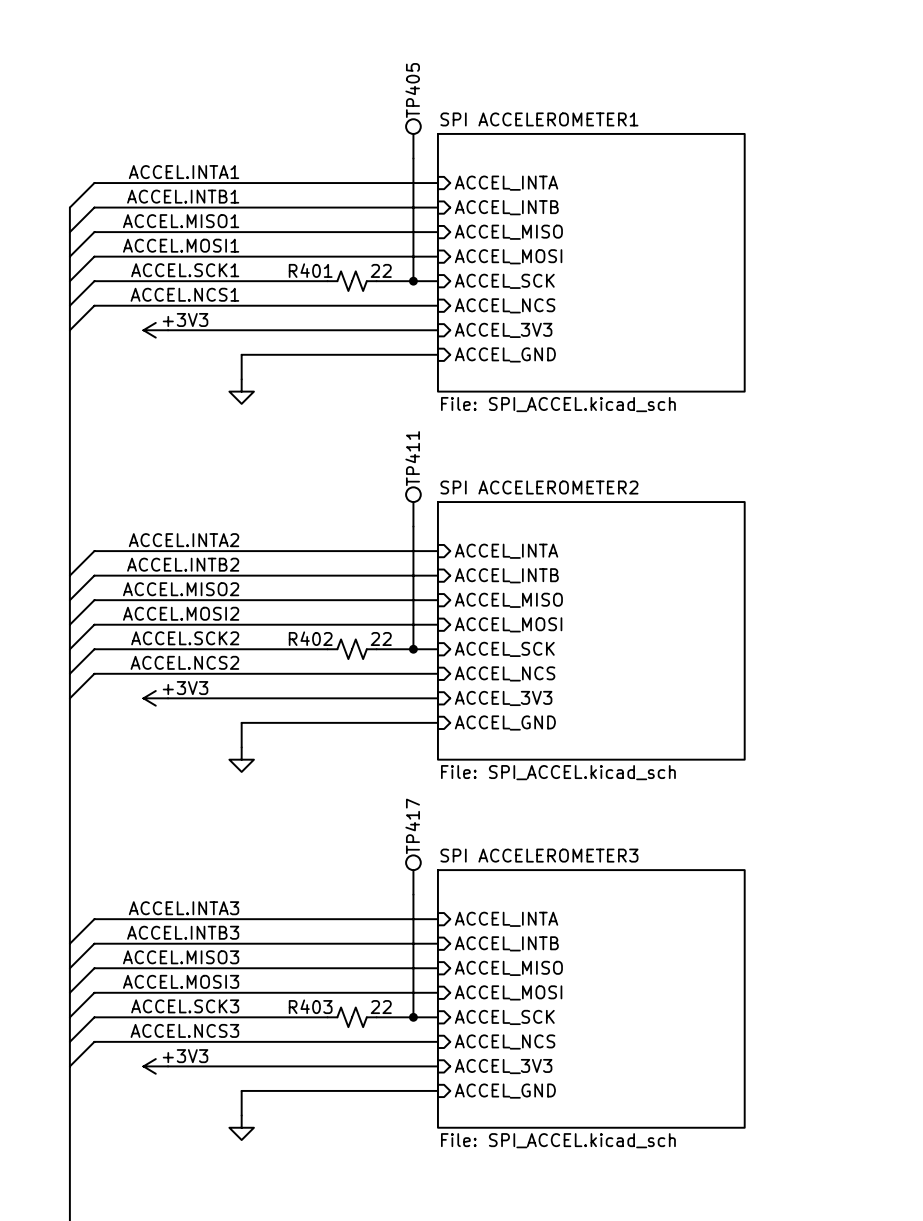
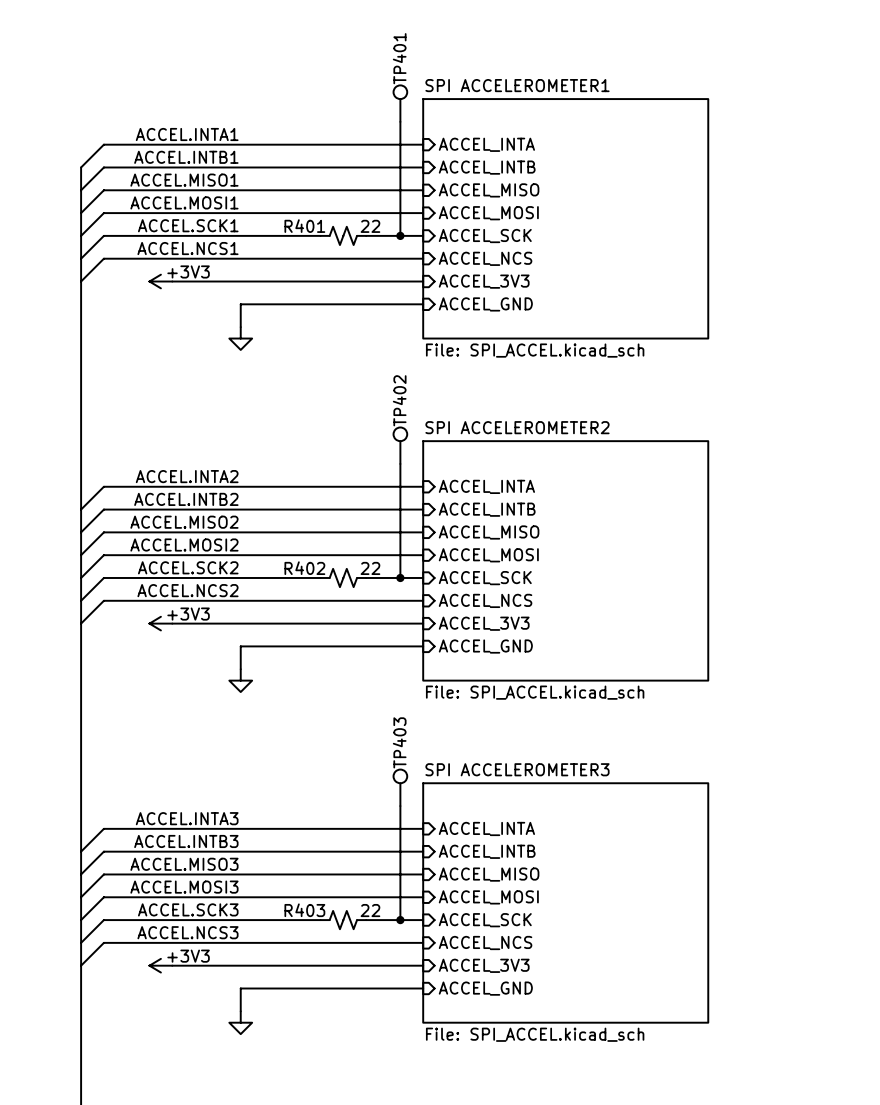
TP405 name: TP405 (412, 90) -> TP401 (399, 58)
TP411 name: TP411 (412, 458) -> TP402 (399, 400)
TP417 name: TP417 (412, 826) -> TP403 (399, 742)

